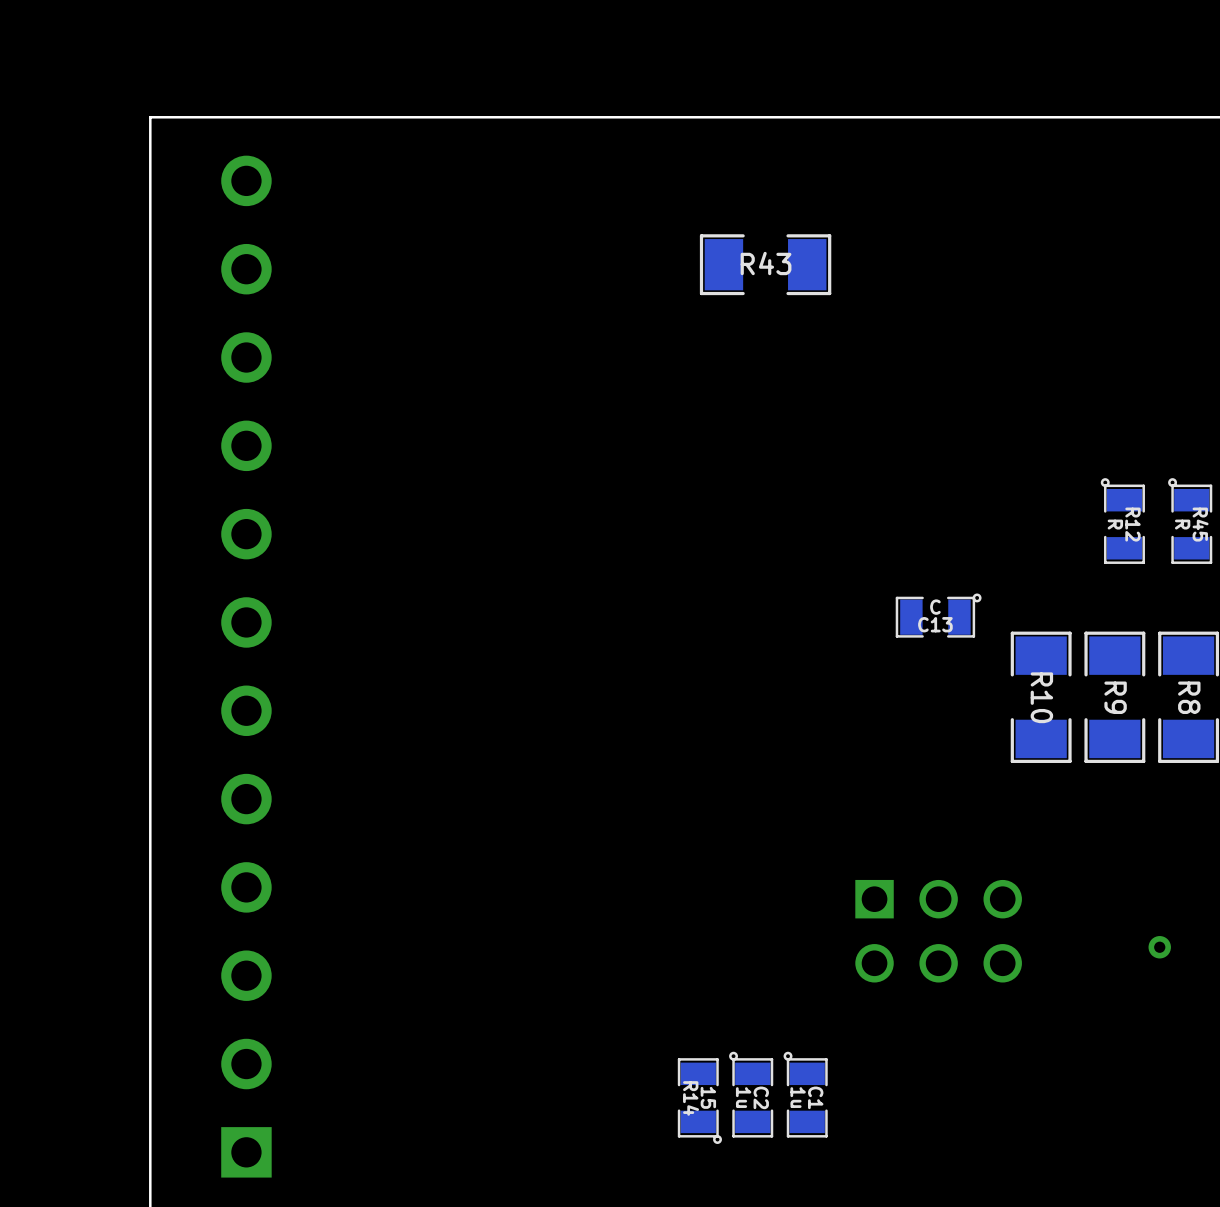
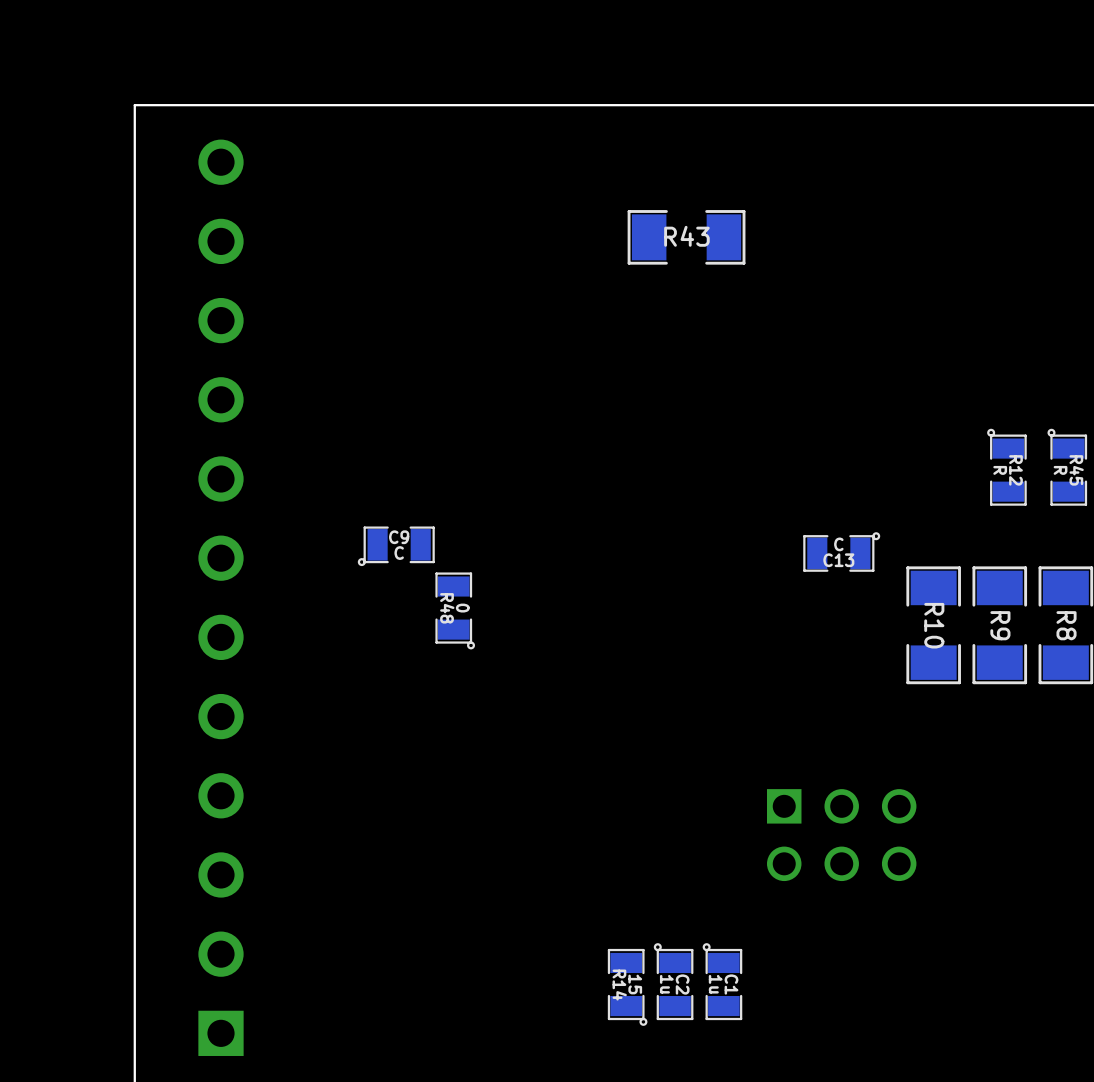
C9: none -> C (396, 546)
R48: none -> 0 (455, 610)
via: (1159, 947) -> none

